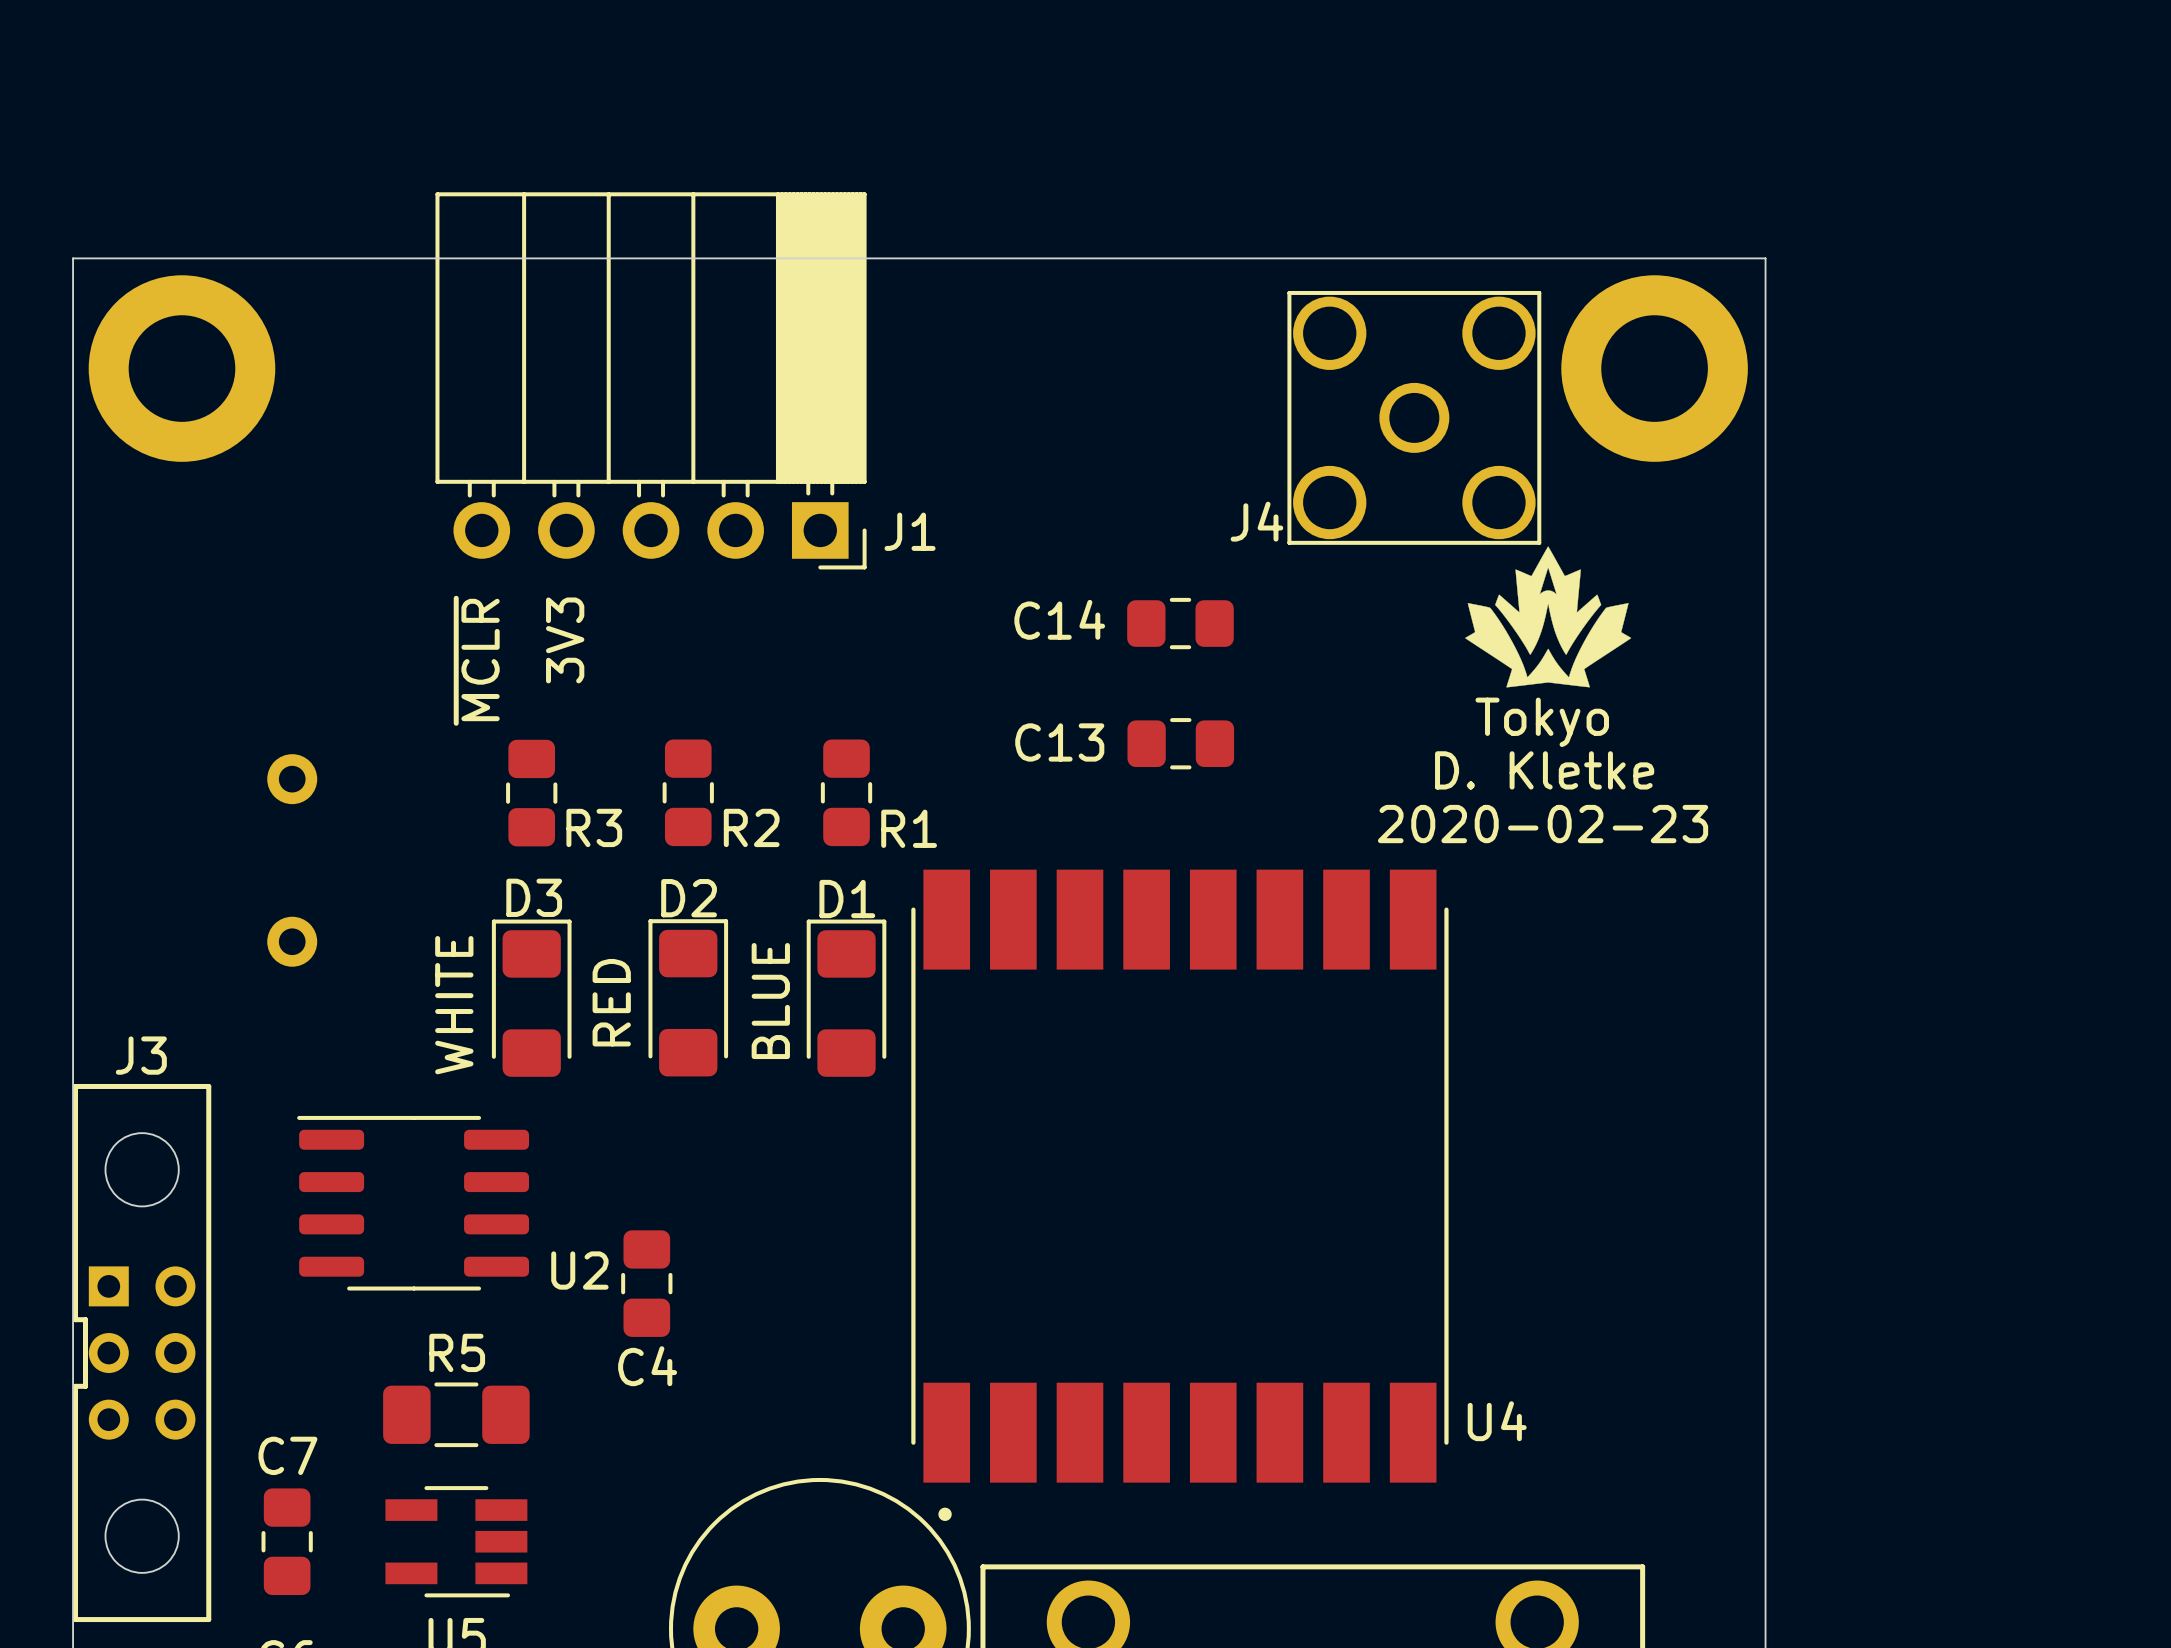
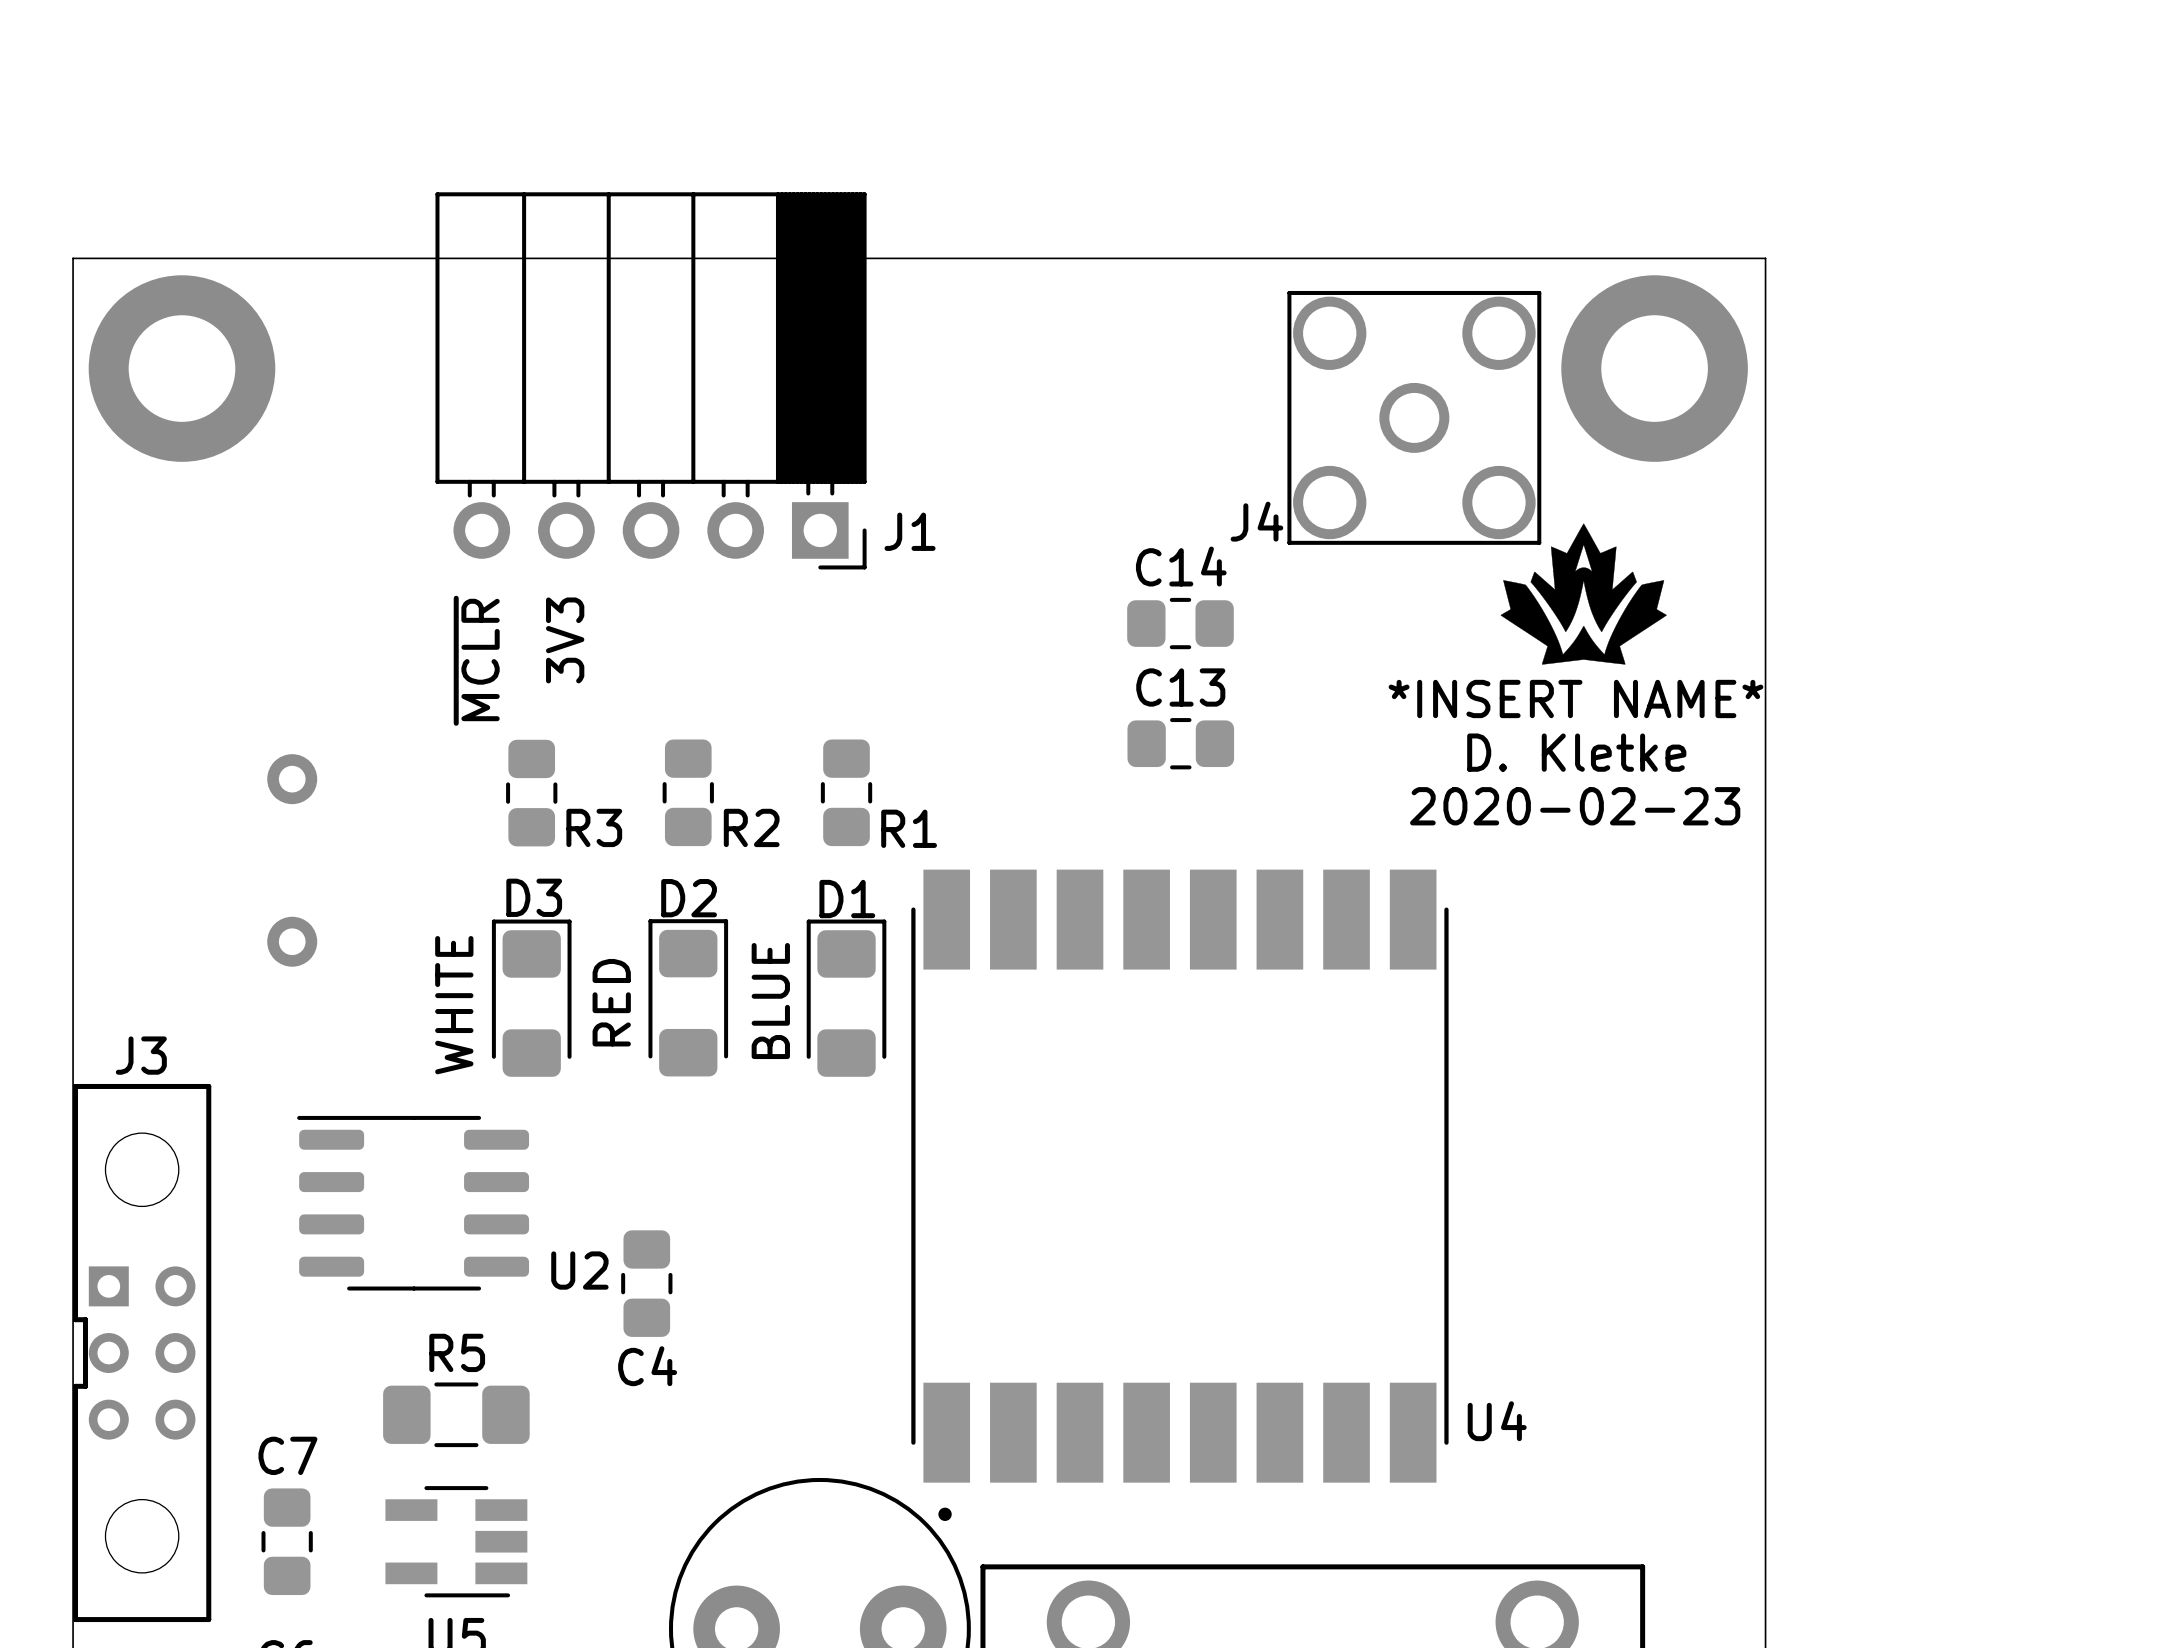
drawing position: (1548, 616) -> (1583, 594)
C14 name position: C14 (1059, 619) -> C14 (1181, 566)
text: none -> *INSERT NAME* (1575, 698)
text: Tokyo (1542, 722) -> none
C13 name position: C13 (1059, 742) -> C13 (1180, 687)
text position: D. Kletke (1544, 770) -> D. Kletke (1576, 752)
text position: 2020-02-23 (1543, 824) -> 2020-02-23 (1575, 806)

